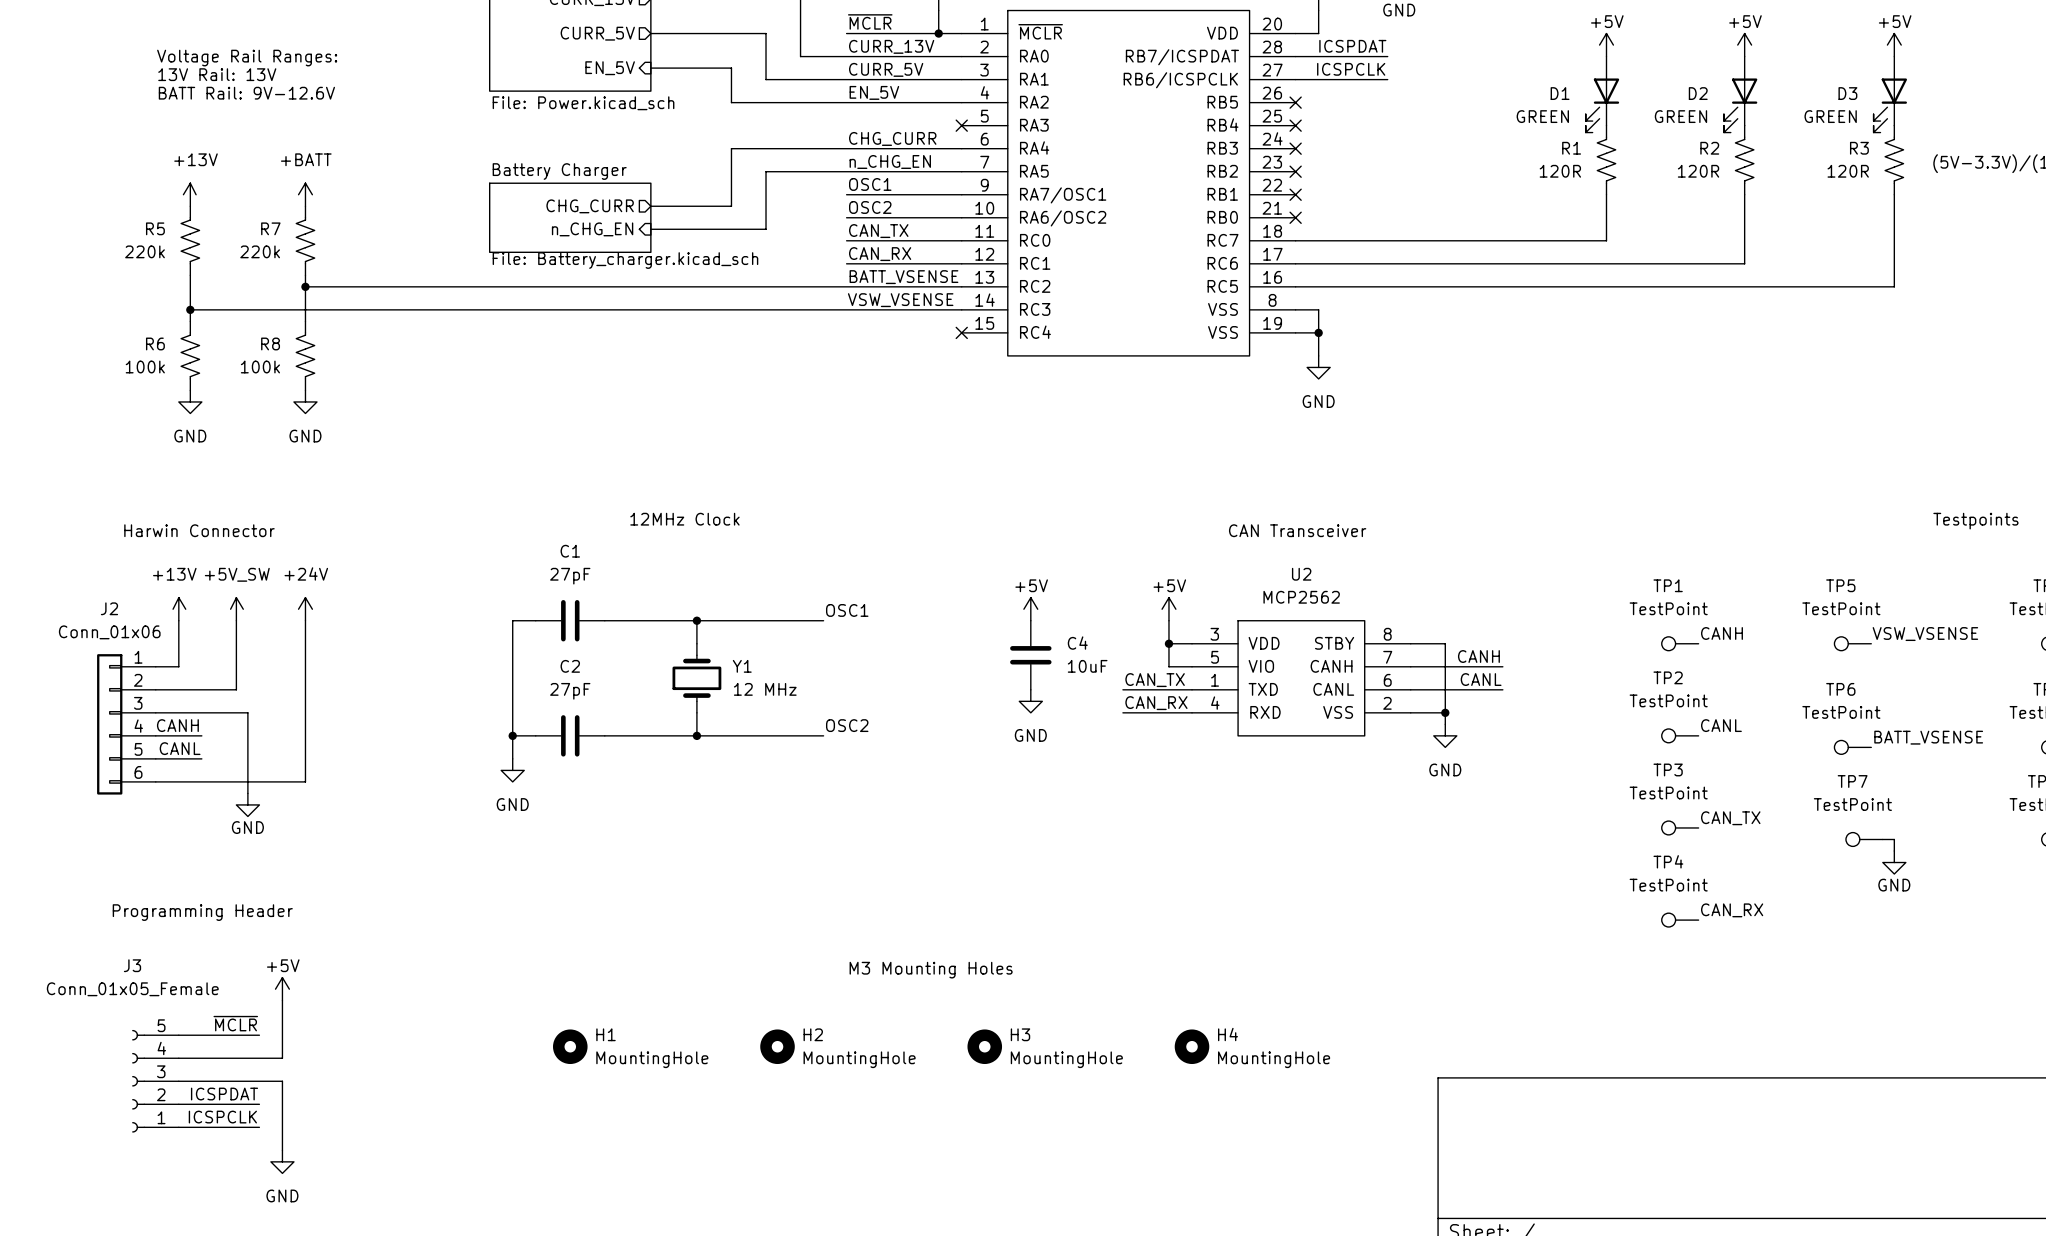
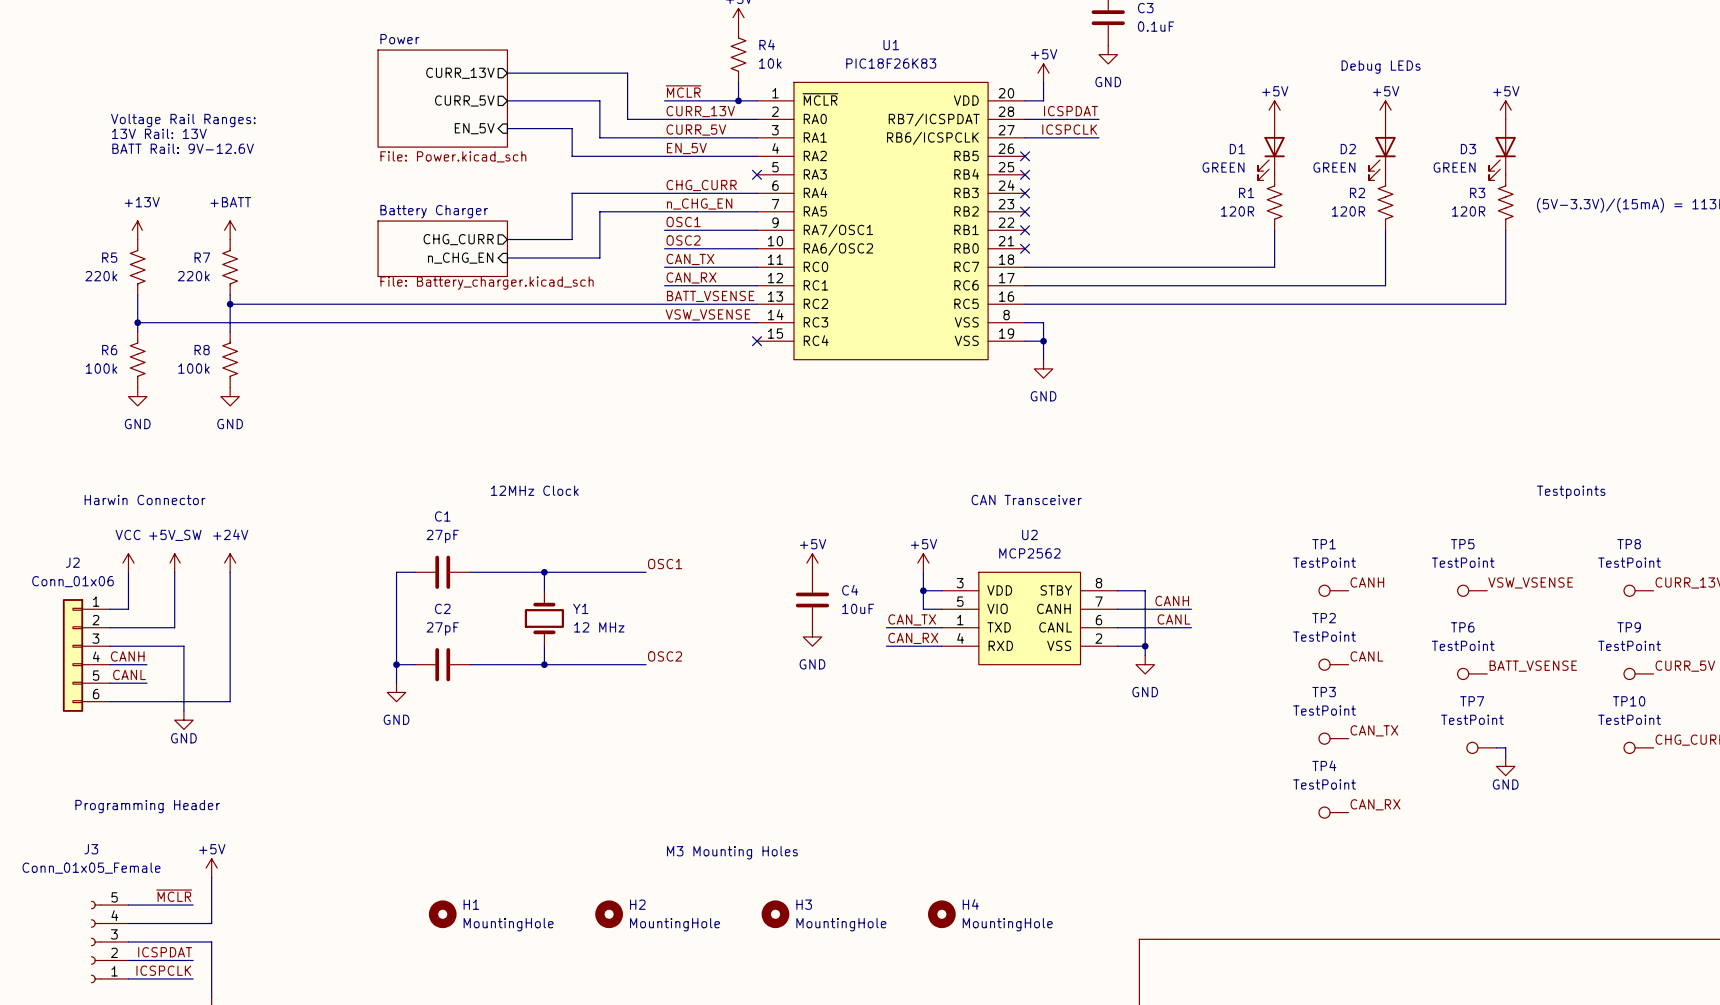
power symbol: +13V (179, 609) -> VCC (128, 563)

